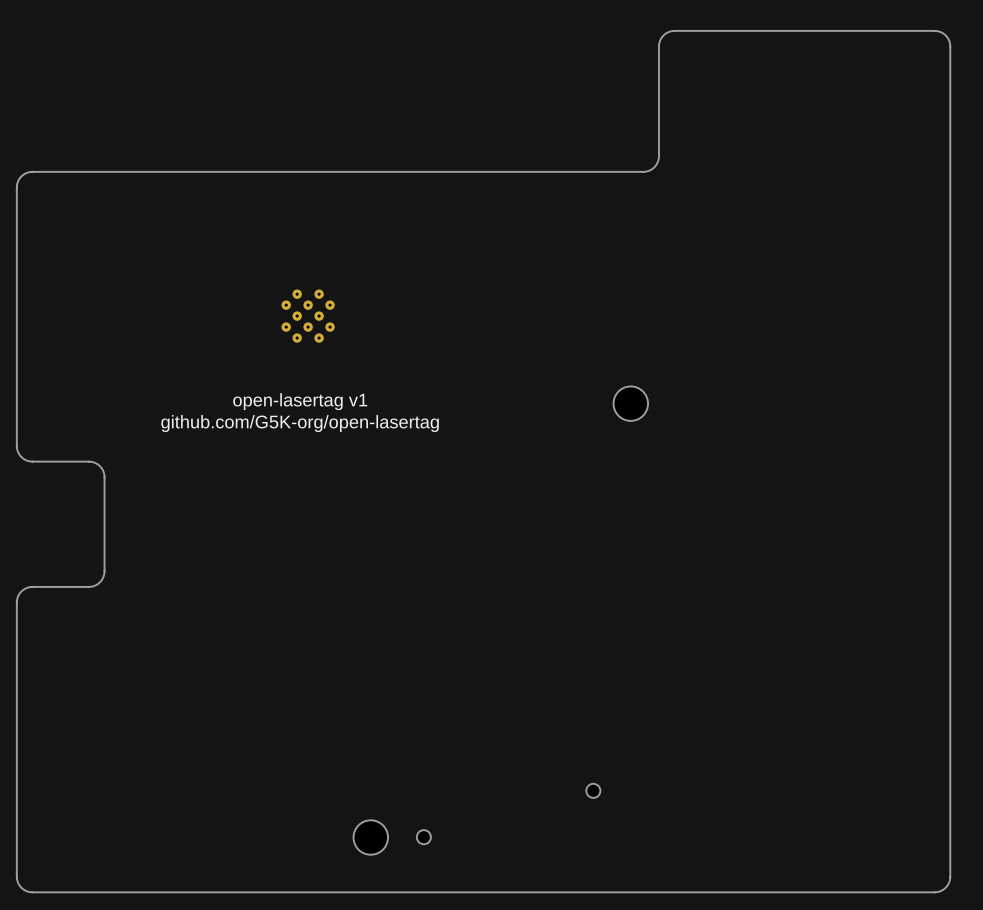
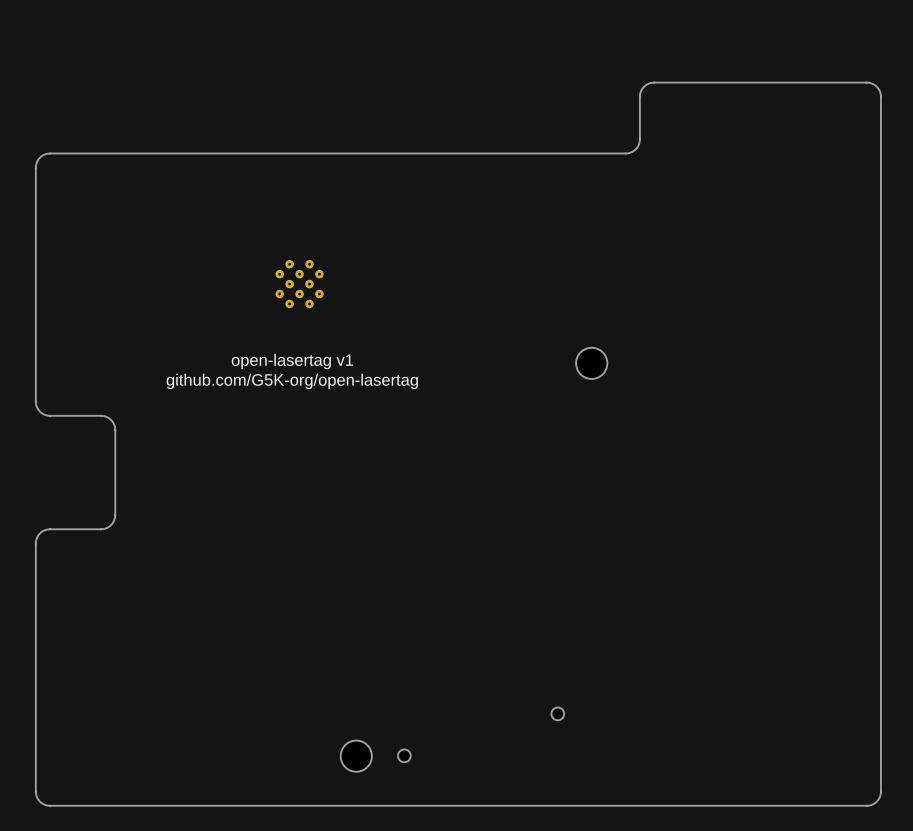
board edge: (950, 109) (950, 44) (945, 35) (938, 31) (671, 31) (662, 36) (659, 44) (658, 159) (653, 168) (643, 171) -> (880, 96) (877, 87) (868, 82) (650, 82) (644, 86) (640, 93) (639, 139) (637, 146) (628, 153) (603, 153)

